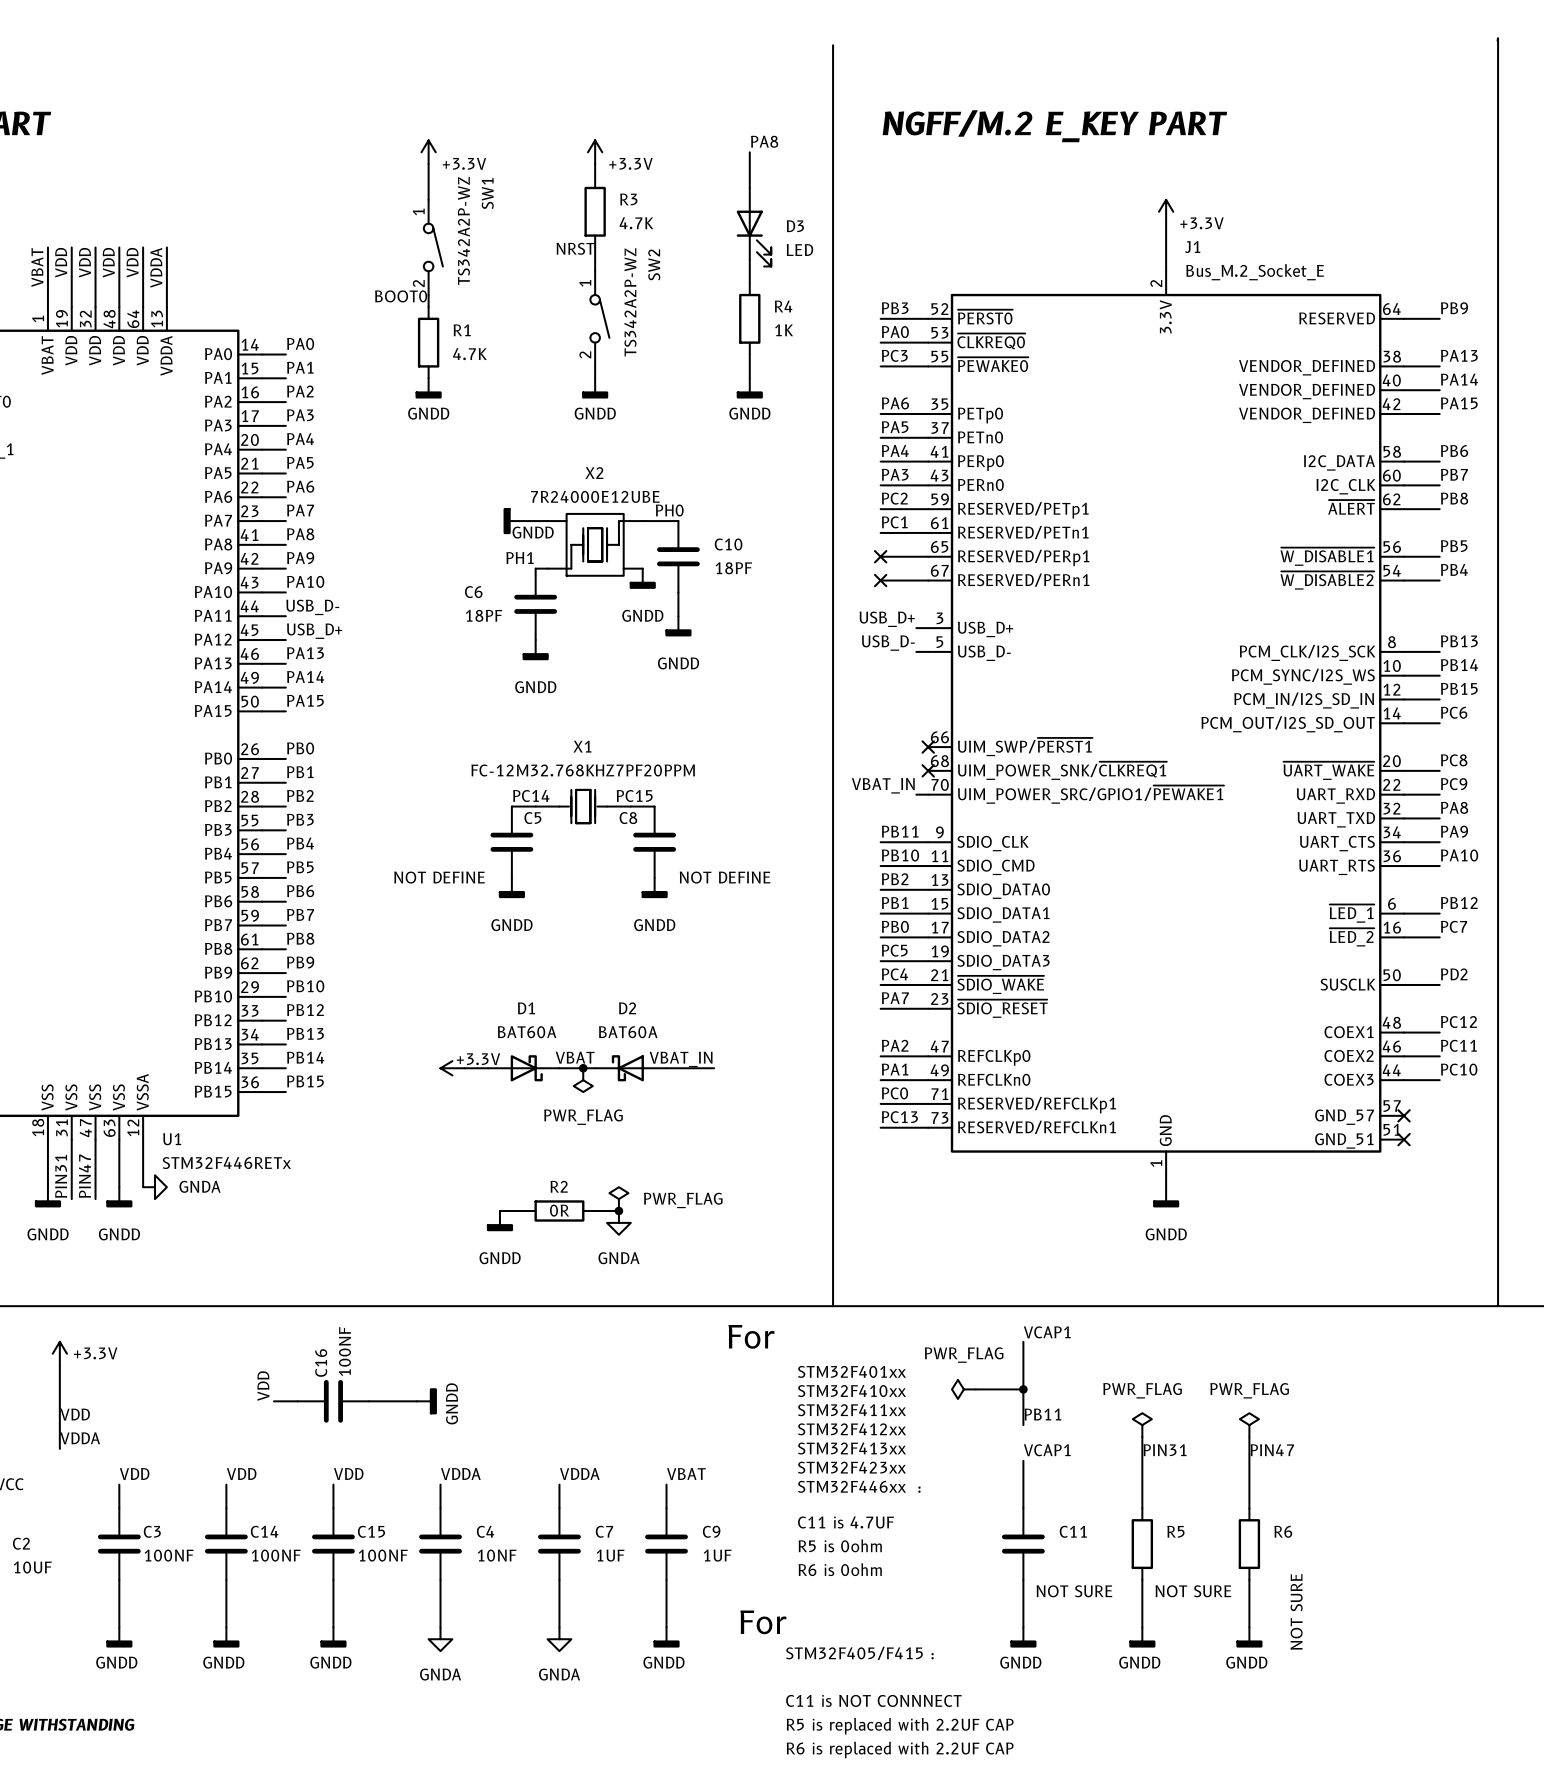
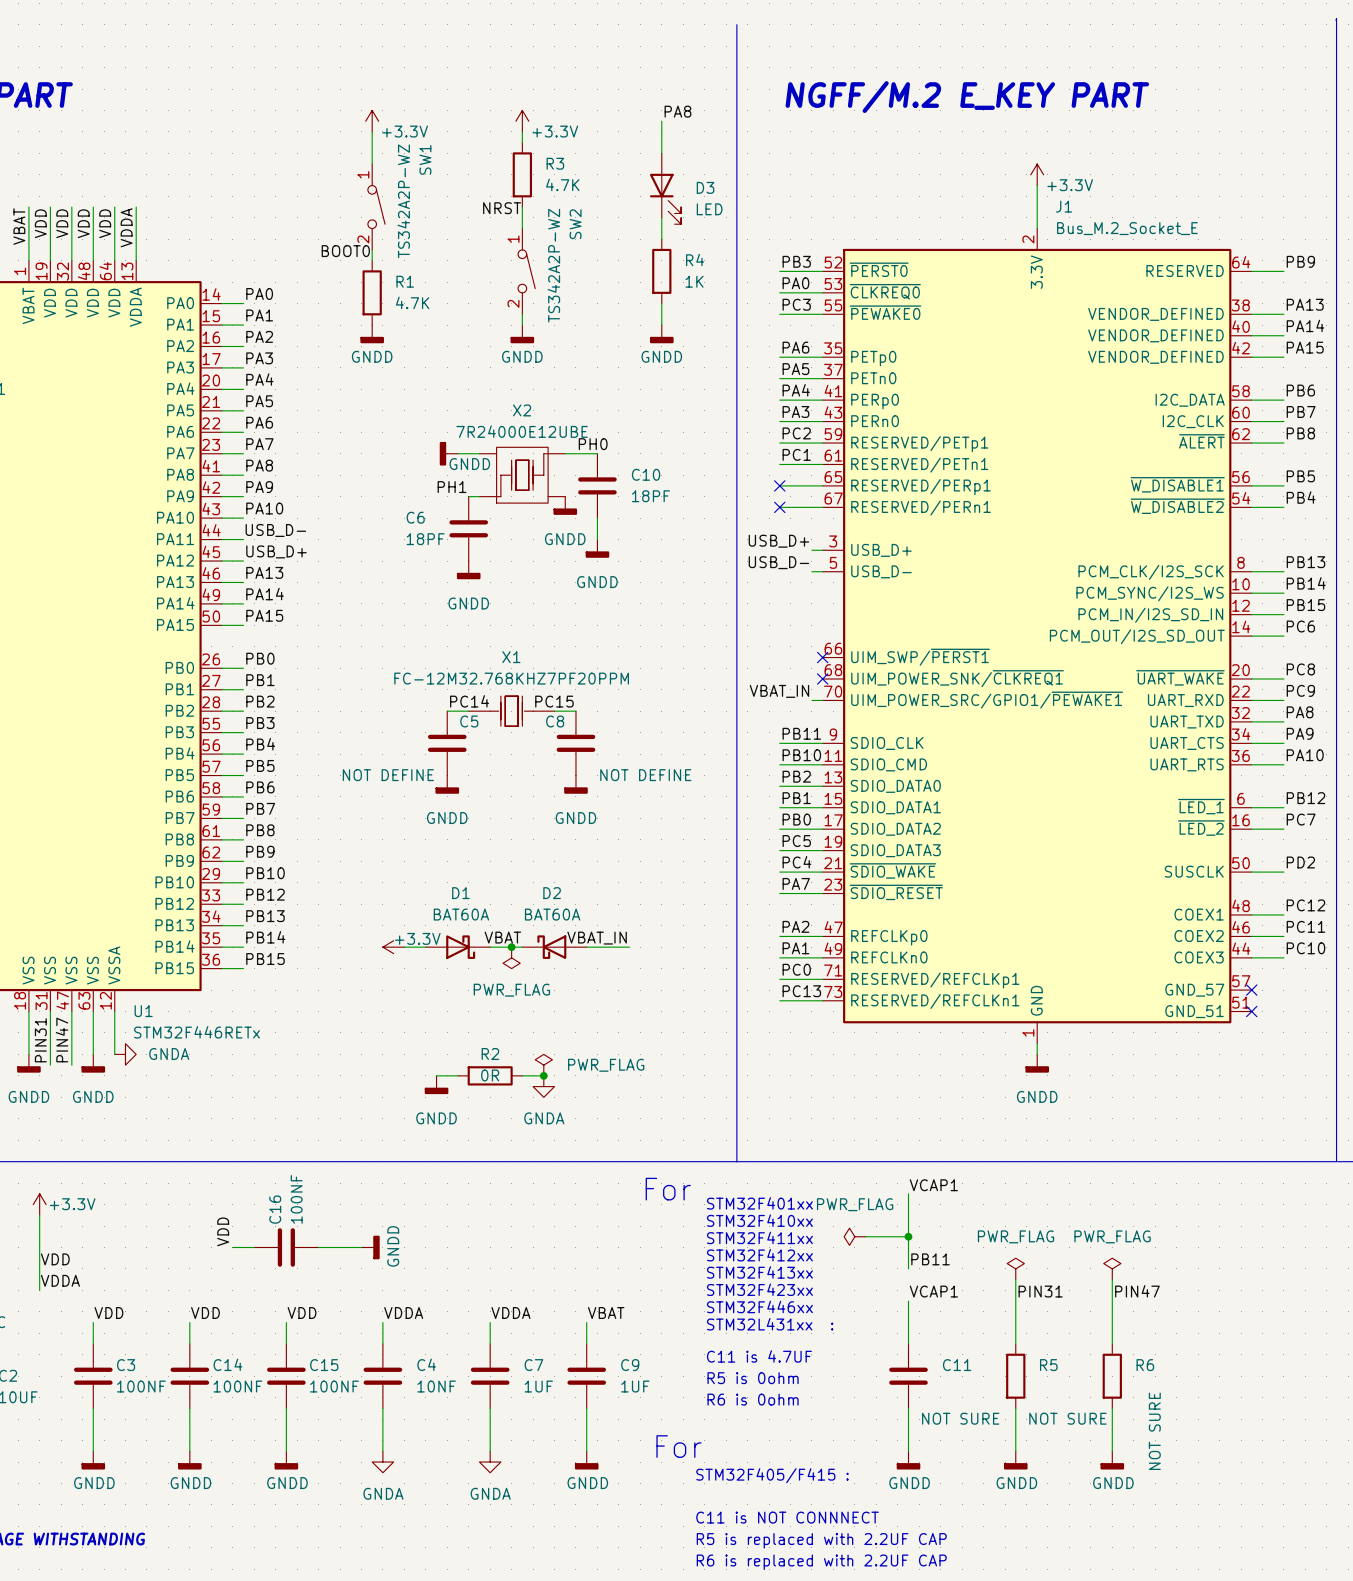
text: none -> STM32F401xx (759, 1203)
text: STM32F401xx (851, 1371) -> STM32F410xx (759, 1220)
text: STM32F410xx (851, 1391) -> STM32F411xx (759, 1237)
text: STM32F411xx (851, 1410) -> STM32F412xx (759, 1255)
text: STM32F412xx (851, 1429) -> STM32F413xx (759, 1272)
text: STM32F413xx (851, 1448) -> STM32F423xx (759, 1289)
text: STM32F423xx (851, 1467) -> STM32F446xx (759, 1306)
text: STM32F446xx : (859, 1486) -> STM32L431xx : (770, 1324)

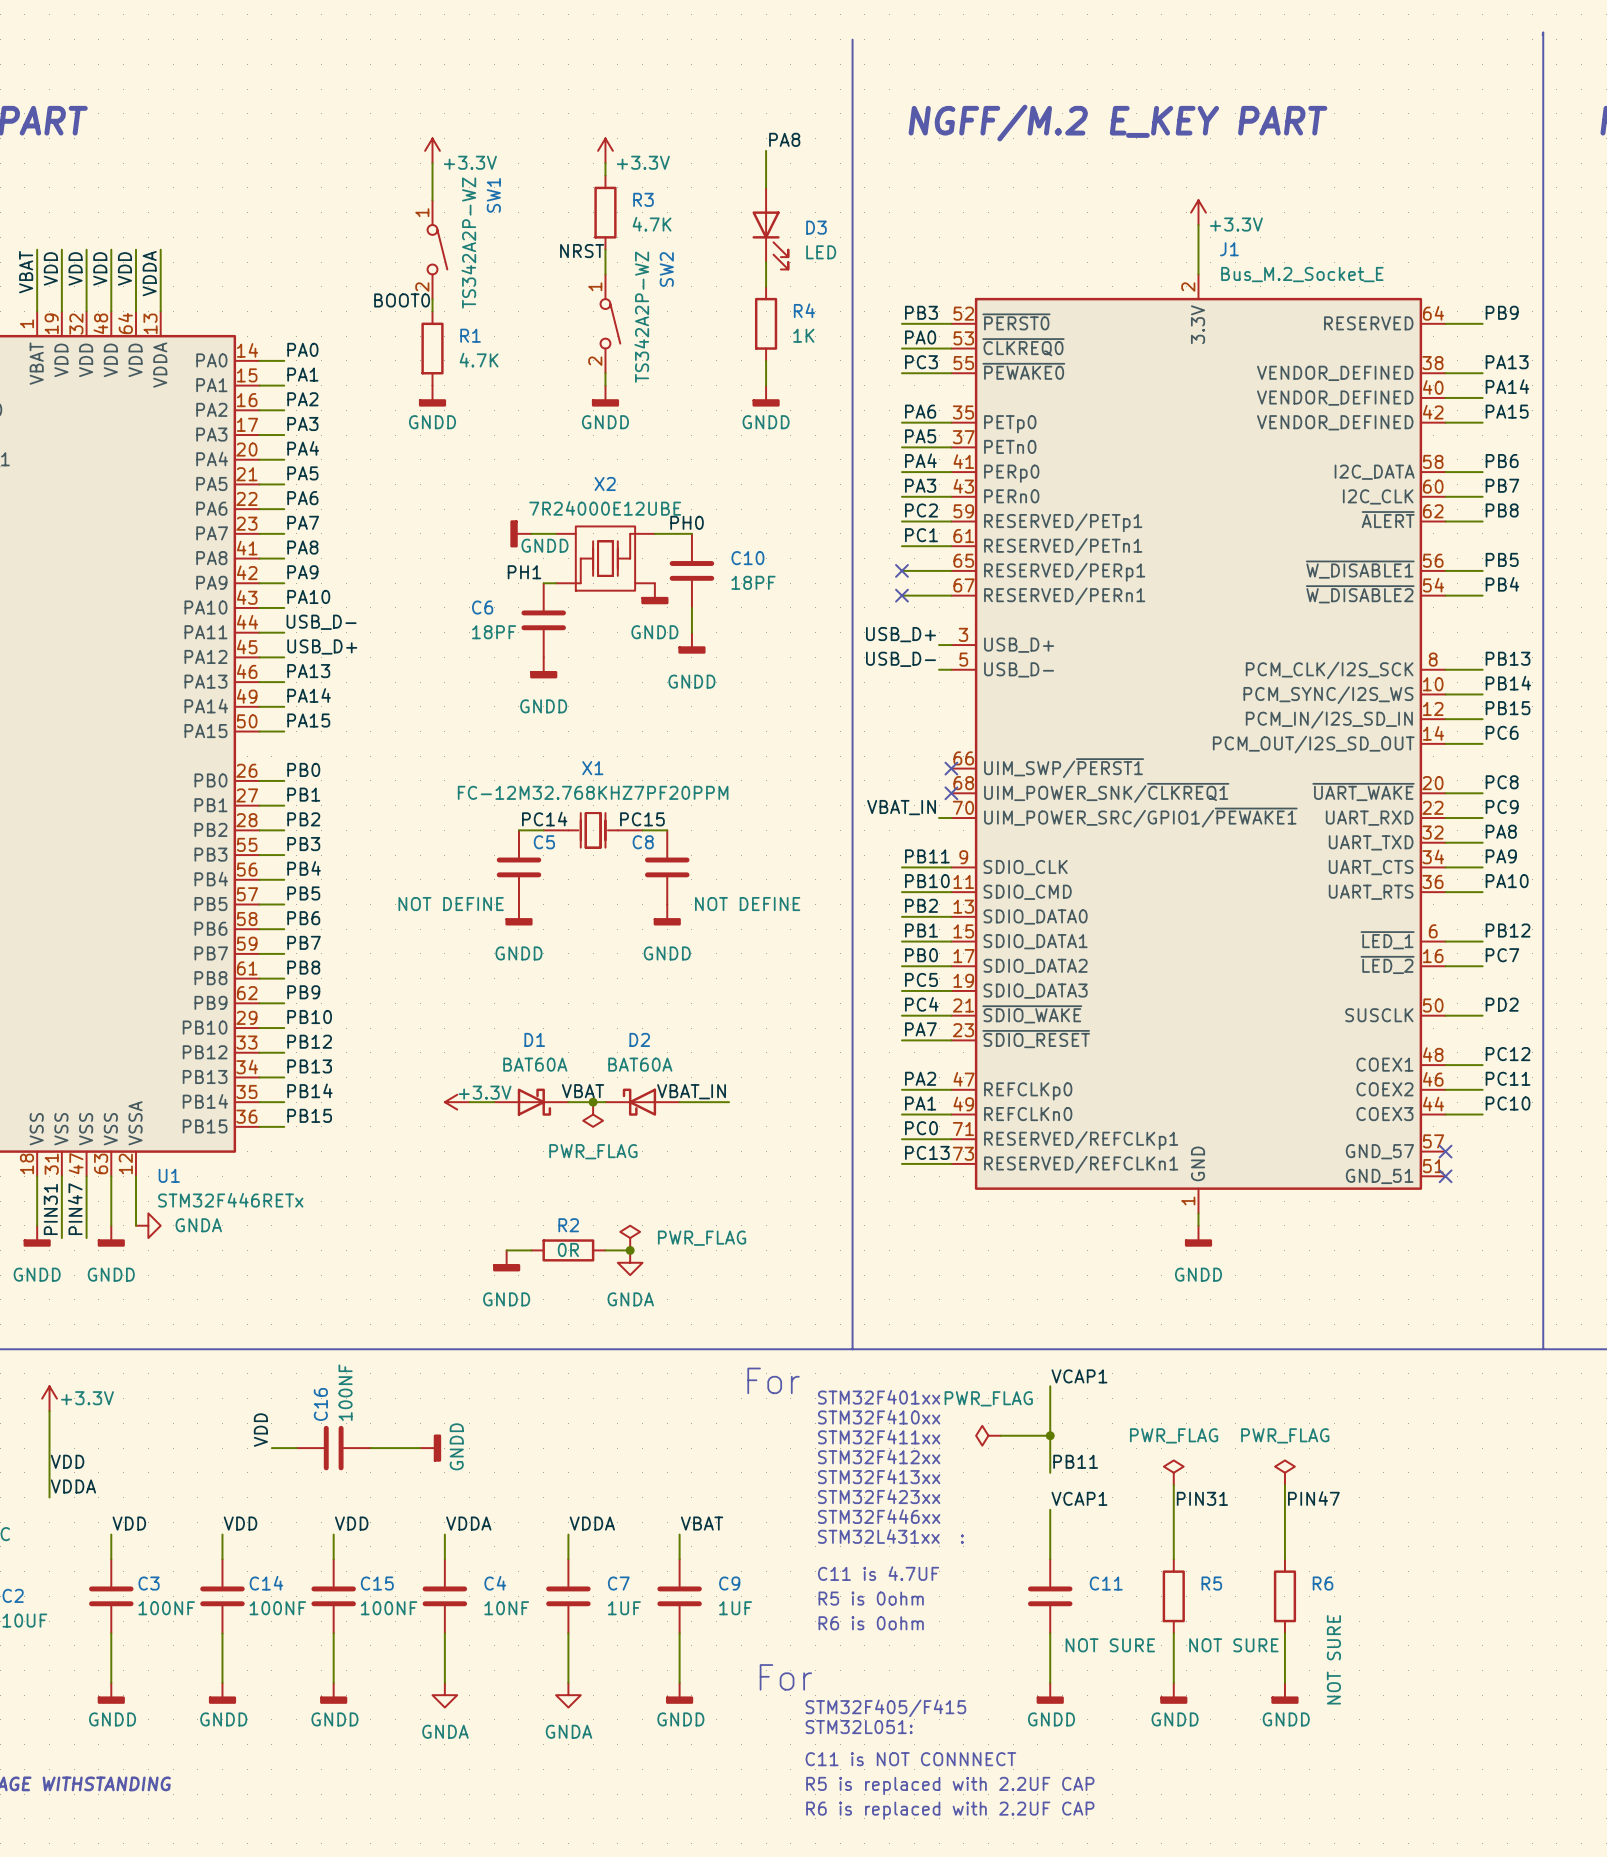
text: STM32F405/F415 : (772, 1475) -> STM32F405/F415 (885, 1708)
text: none -> STM32L051: (859, 1727)

